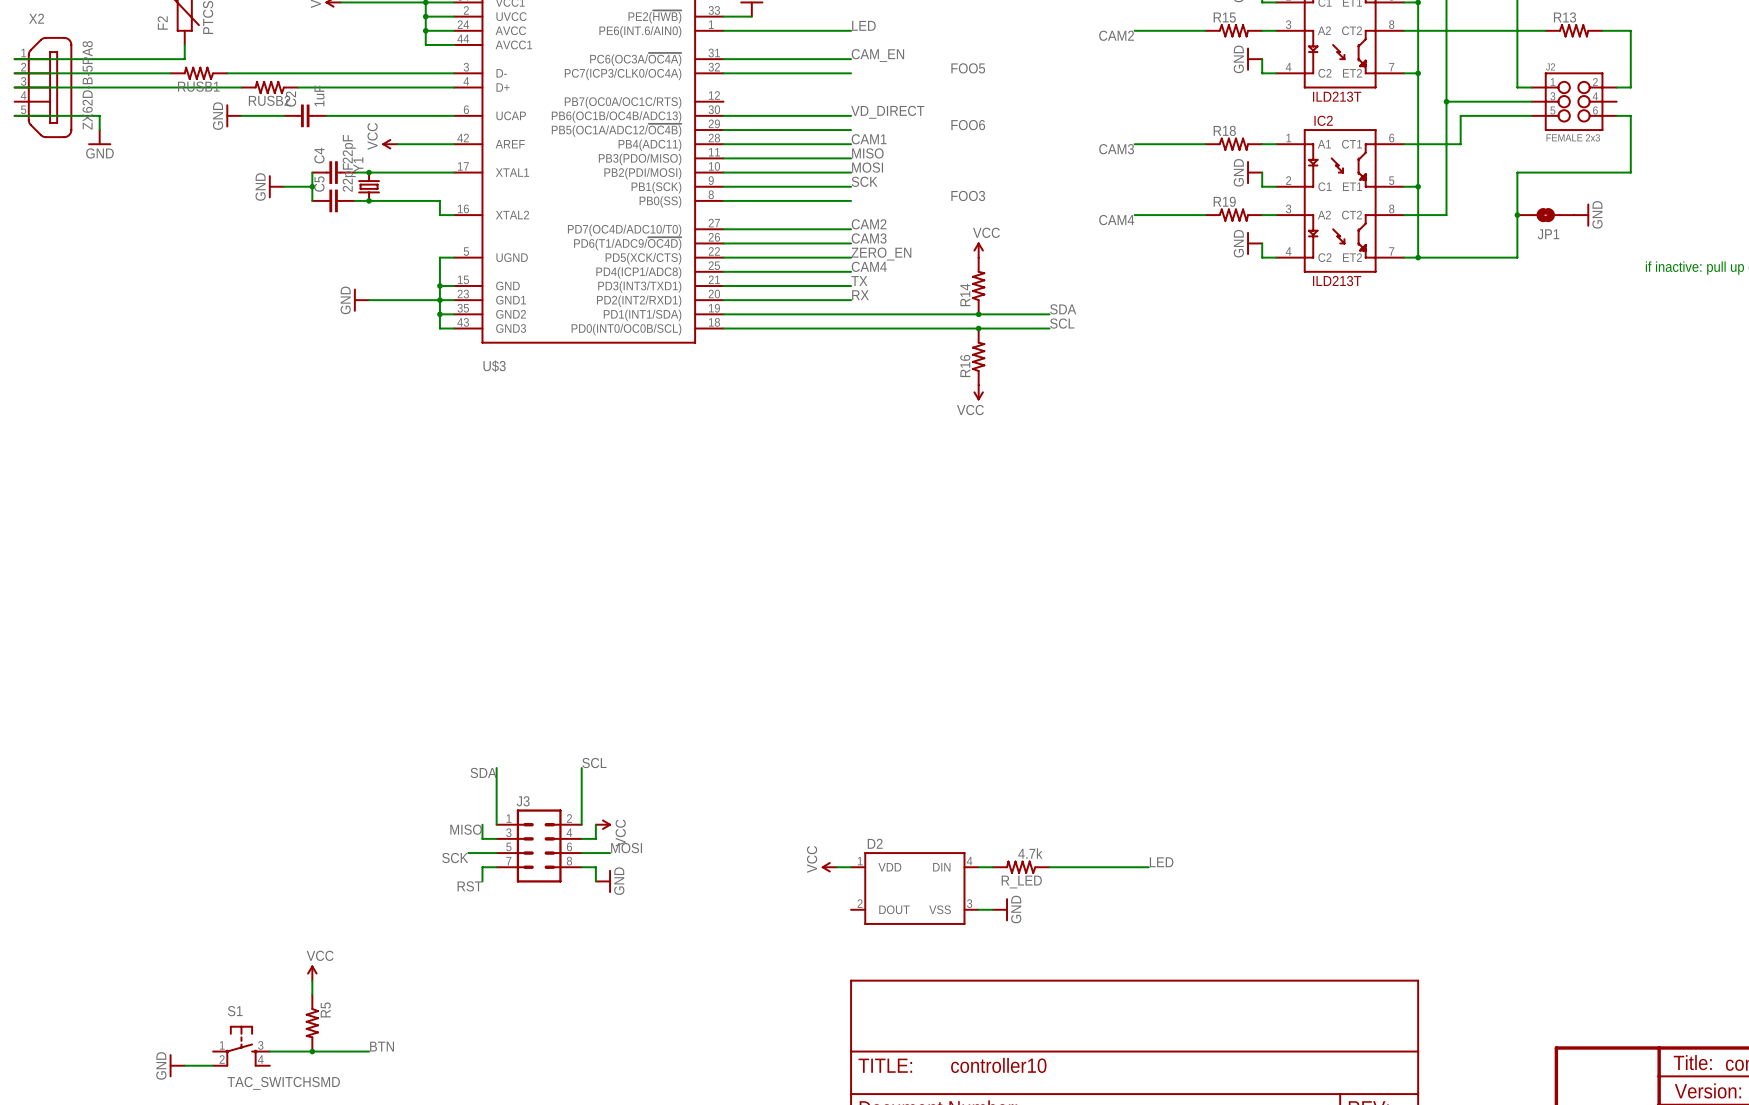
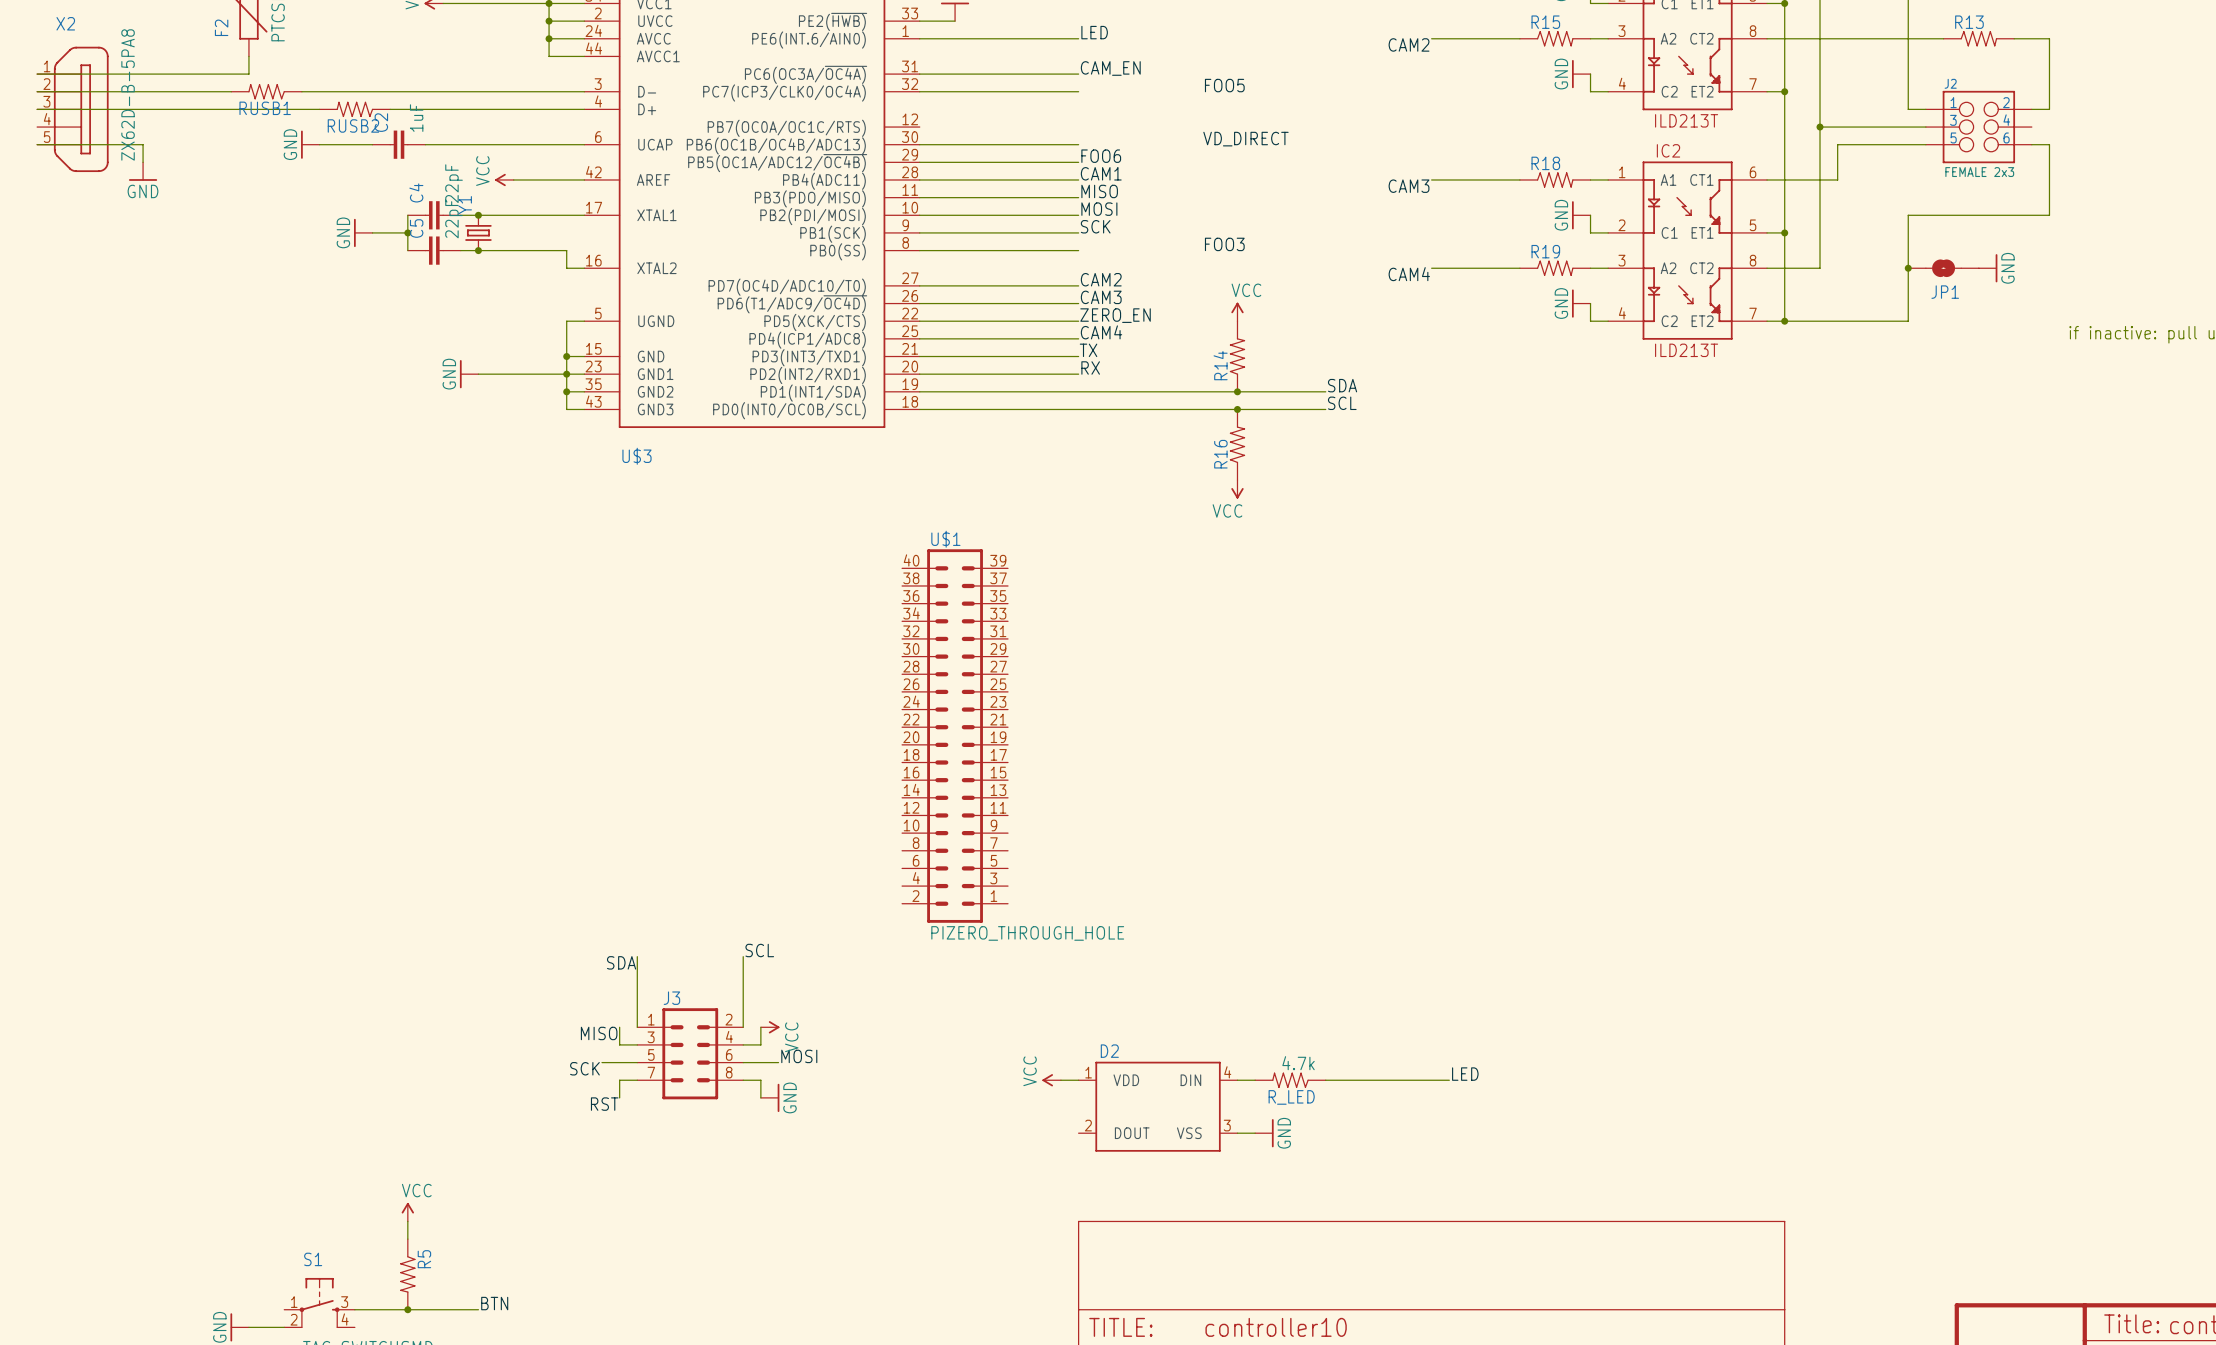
label position: VD_DIRECT (887, 112) -> VD_DIRECT (1245, 139)
label position: FOO6 (968, 125) -> FOO6 (1101, 156)
U$1: none -> PIZERO_THROUGH_HOLE (955, 736)

